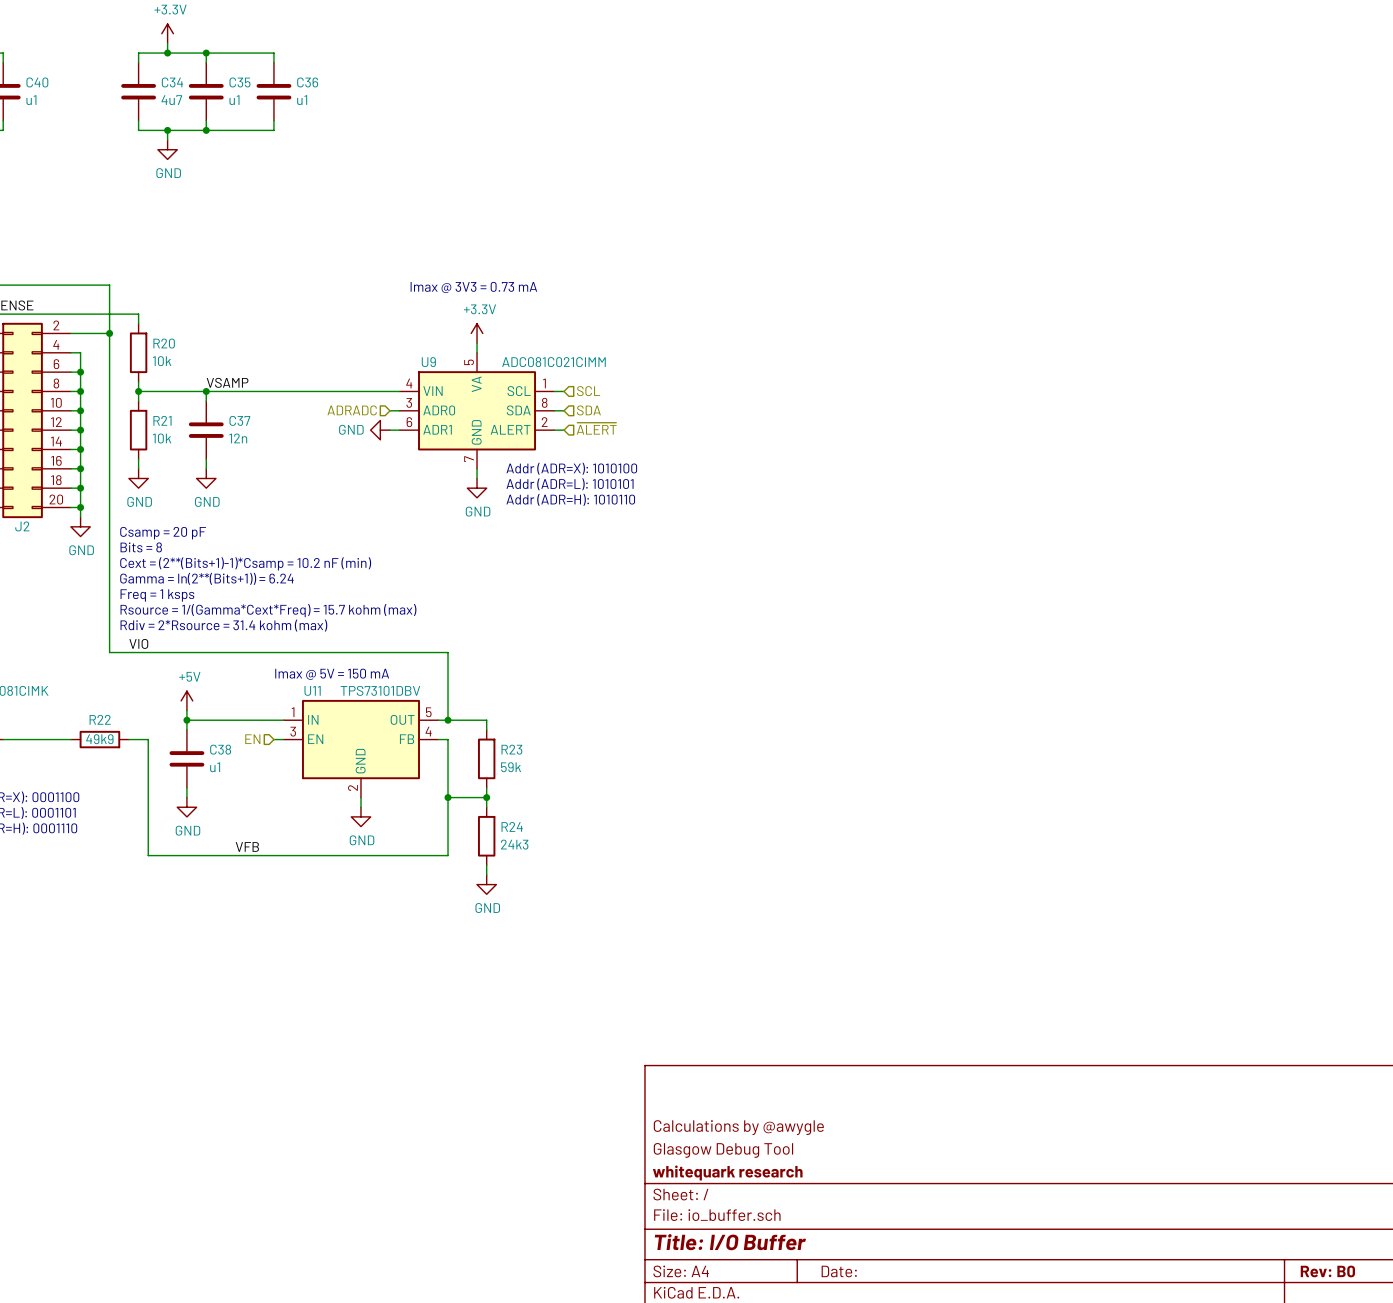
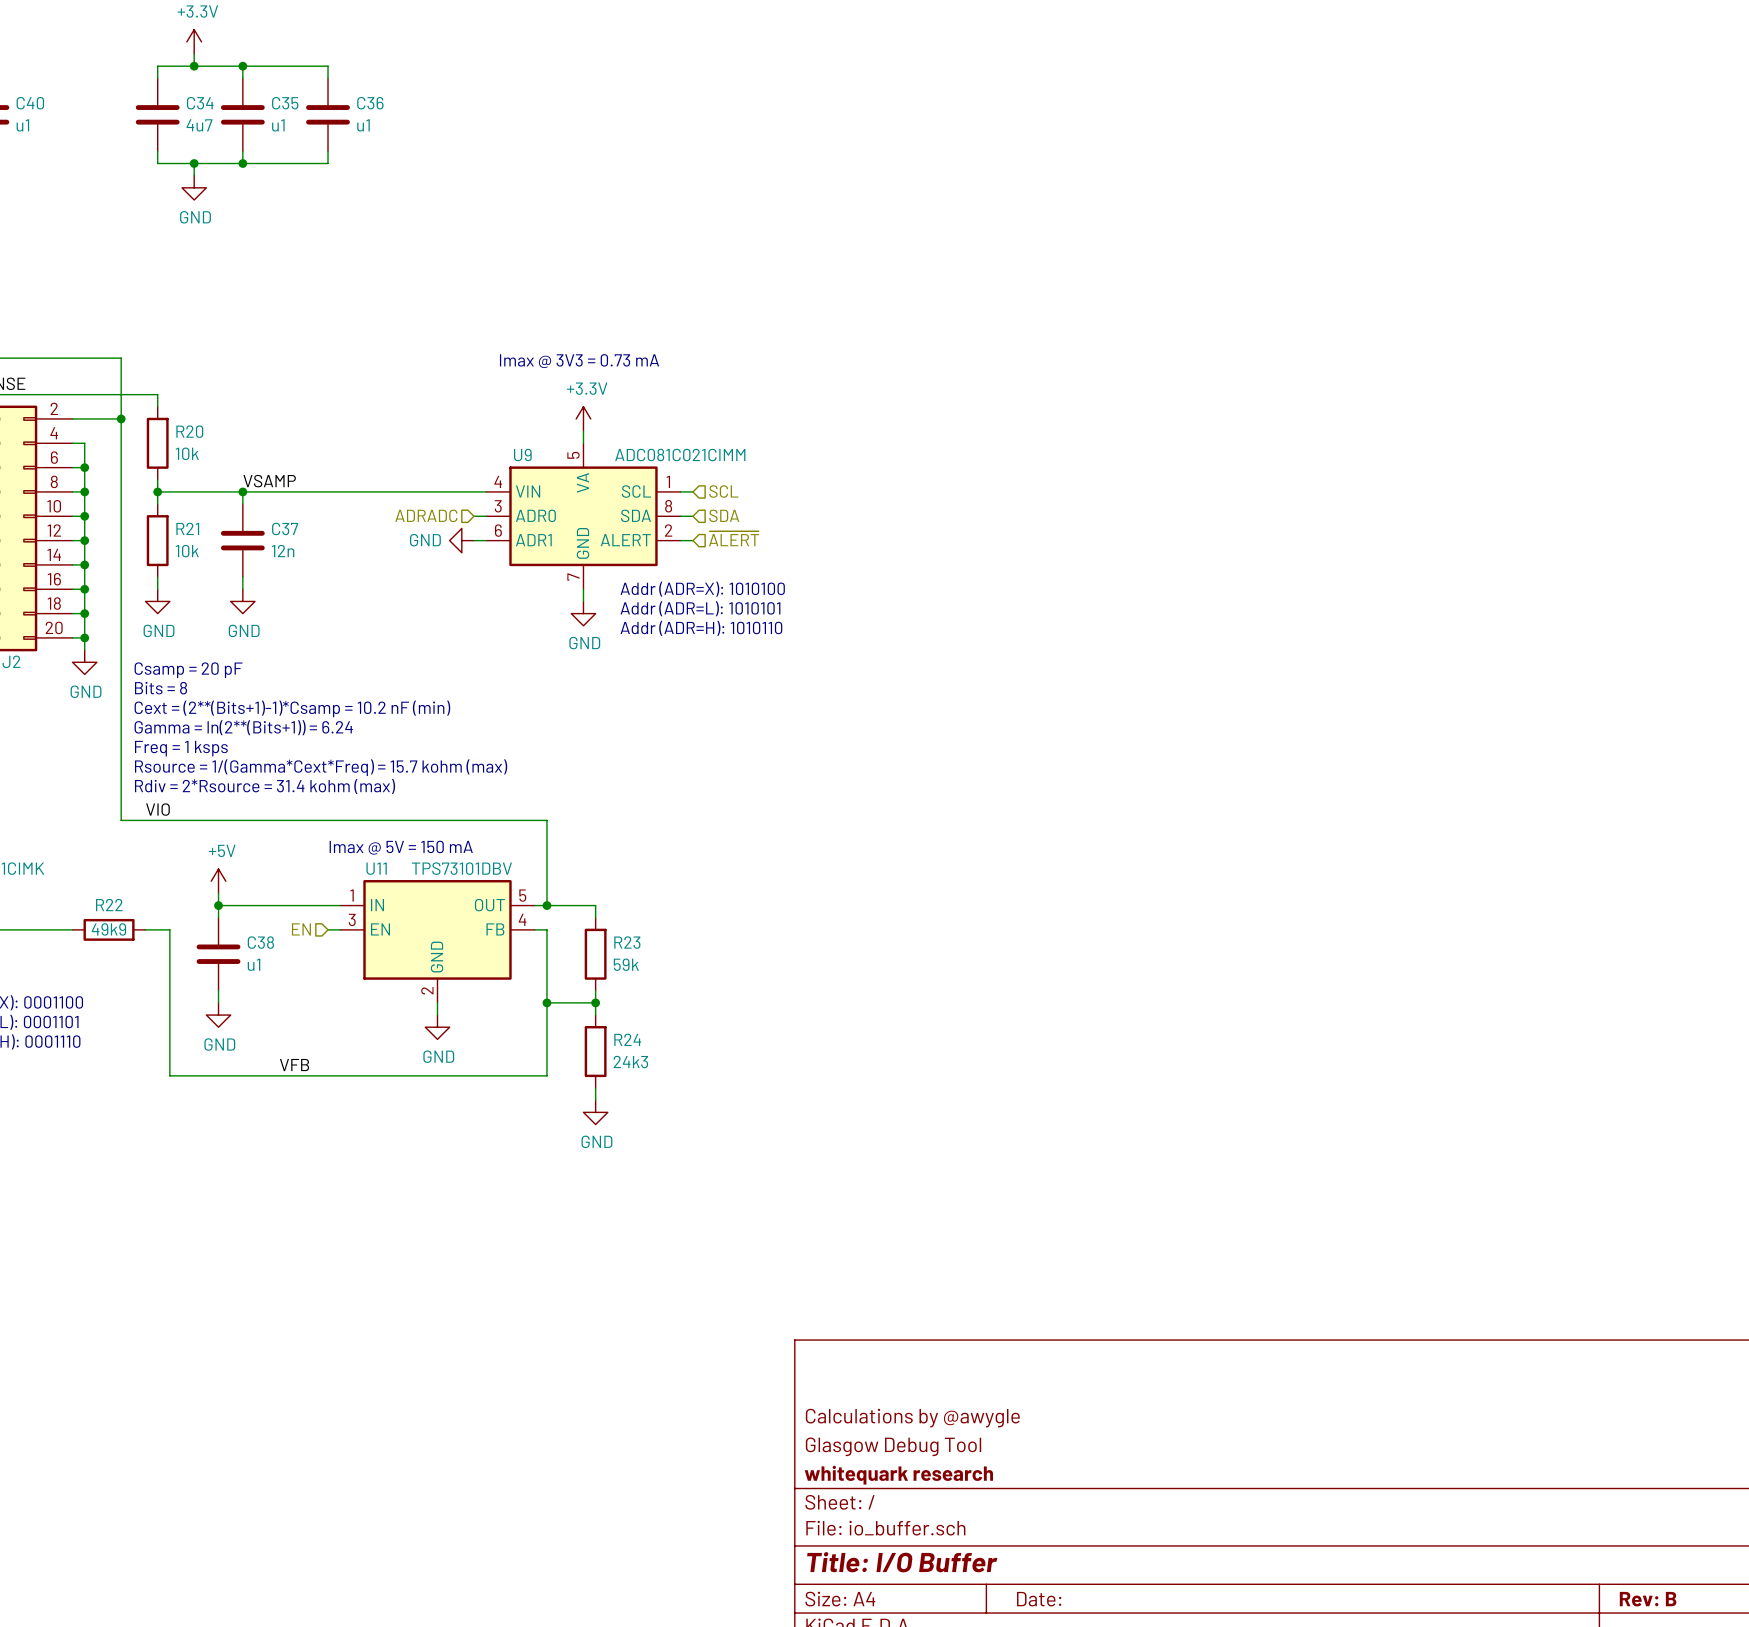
title block: Rev: B0 (1327, 1271) -> Rev: B (1648, 1599)

